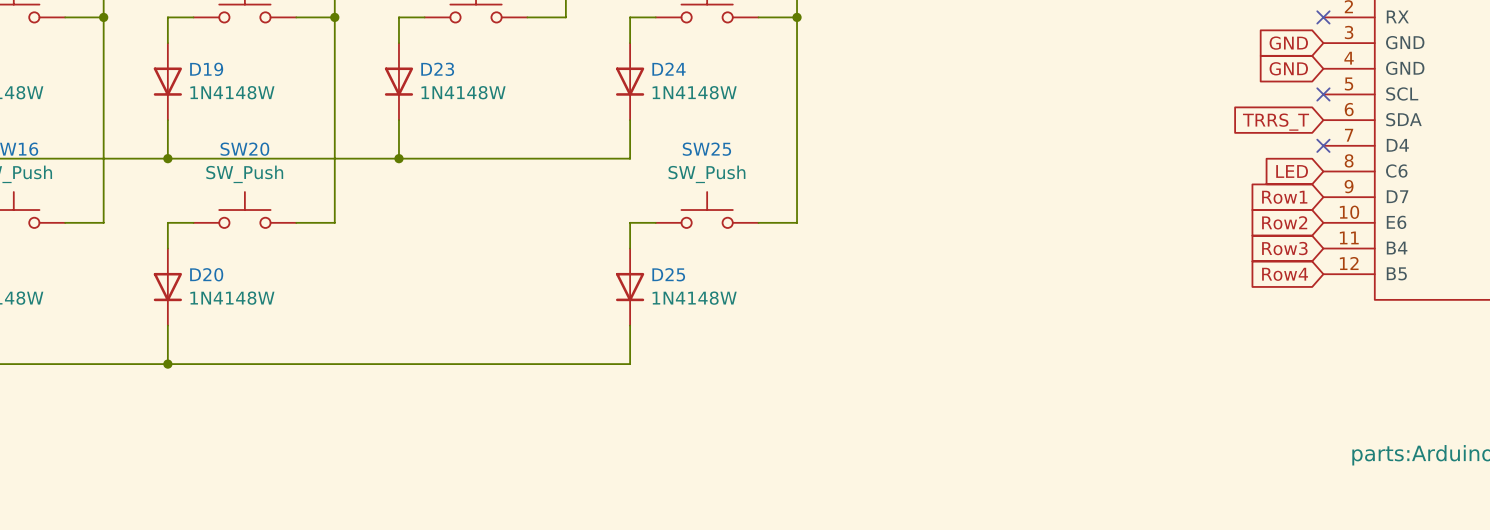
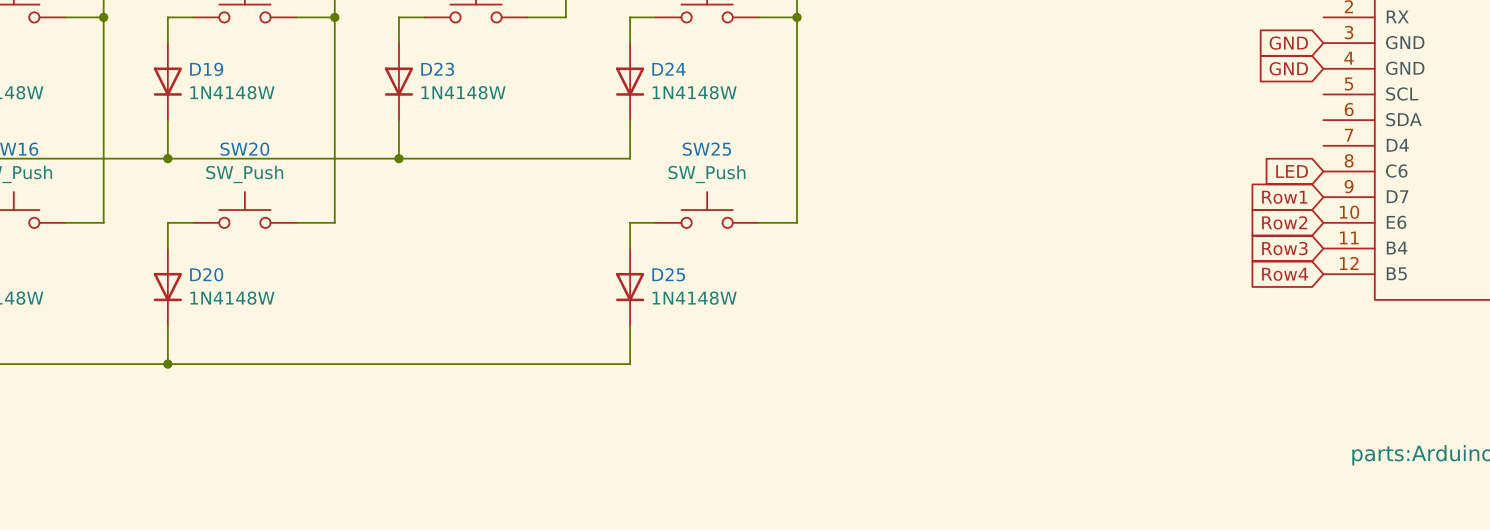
no-connect mark: (1323, 17) -> none
no-connect mark: (1323, 94) -> none
global label: TRRS_T (1276, 122) -> none
no-connect mark: (1323, 145) -> none

